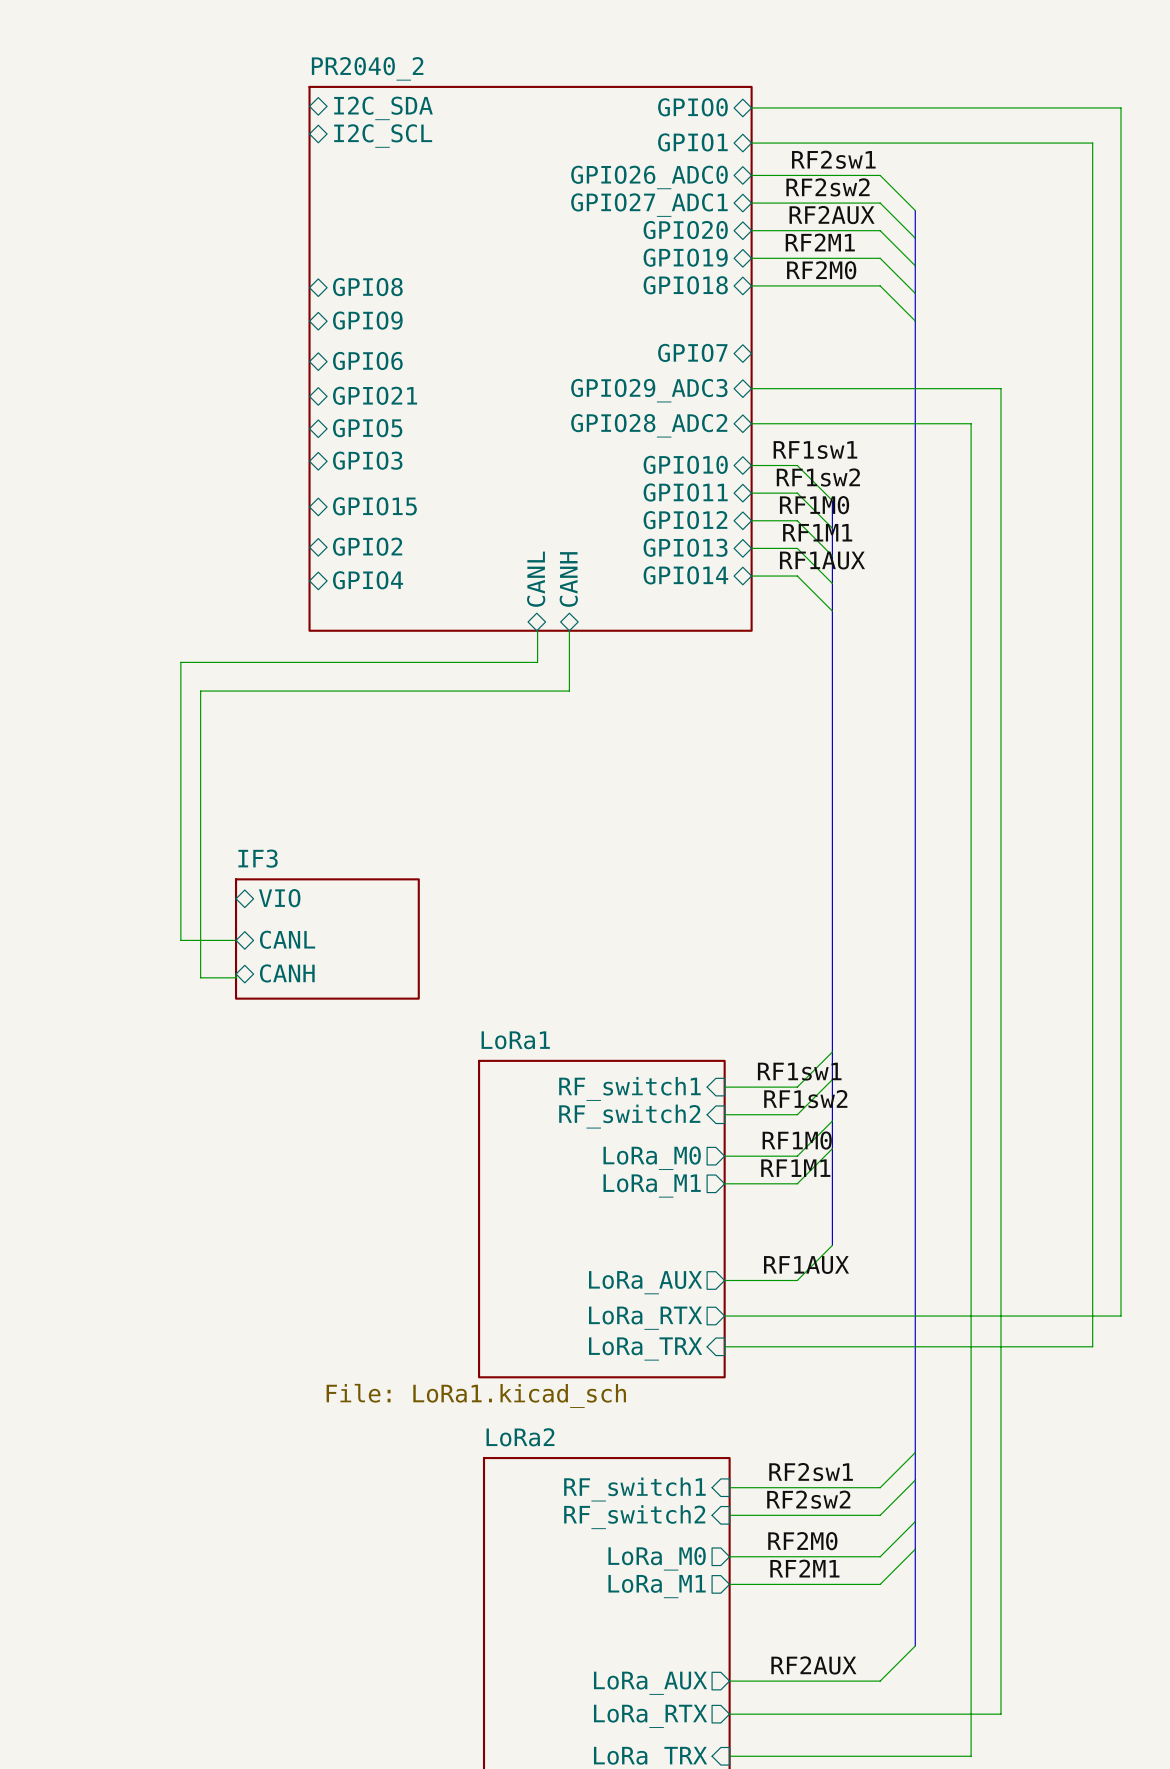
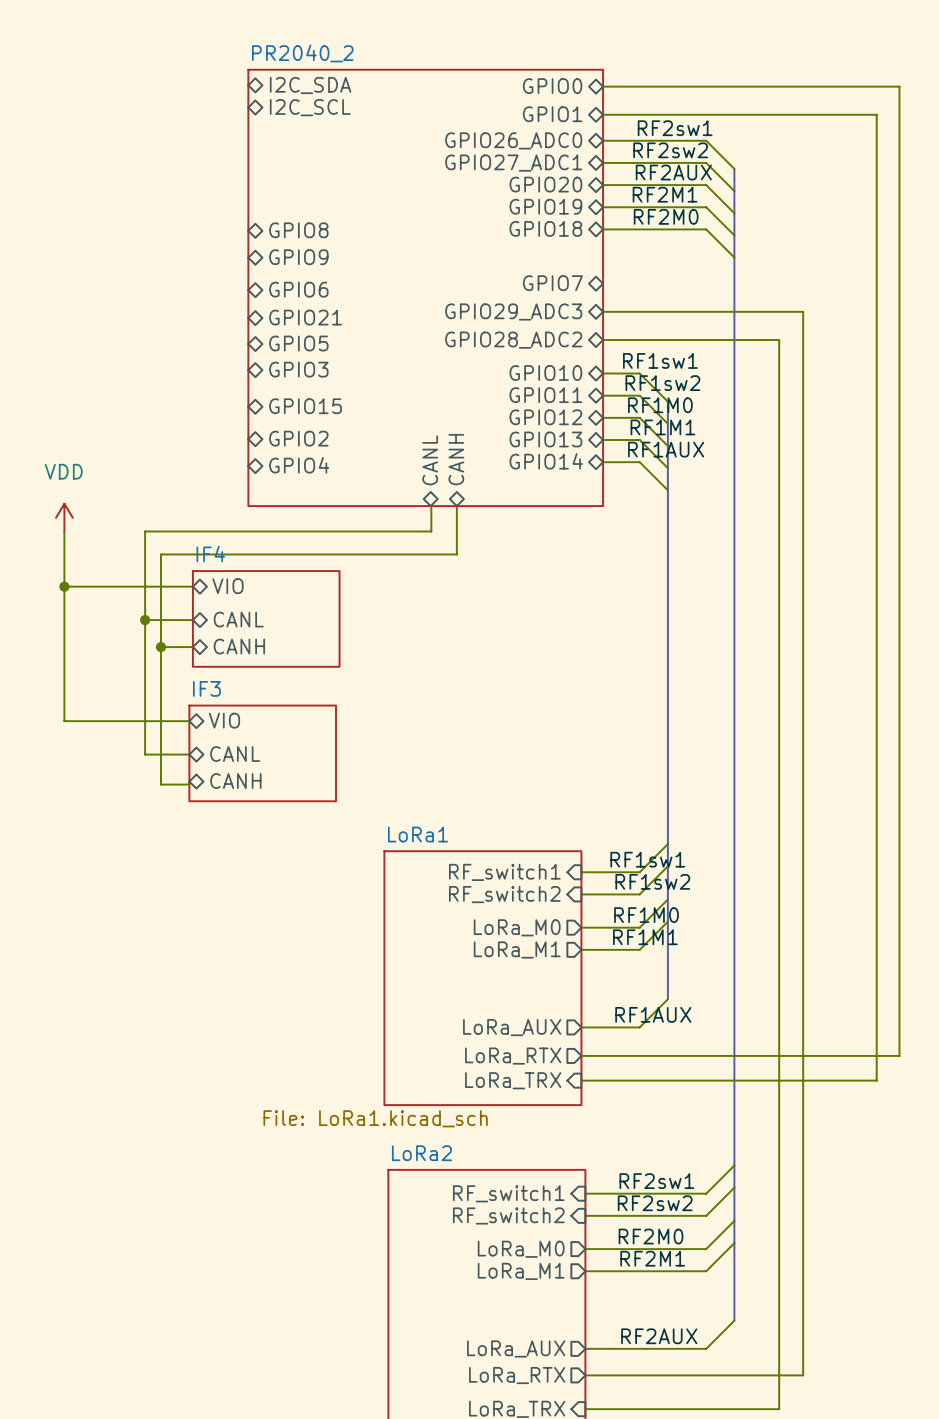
power symbol: none -> VDD (64, 517)
wire: none -> (64, 531) (64, 721) (189, 721)
sheet pin: none -> VIO (227, 586)
wire: none -> (64, 586) (192, 586)
junction: none -> (64, 586)
sheet IF4: none -> (266, 618)
wire: none -> (145, 620) (192, 620)
junction: none -> (145, 620)
sheet pin: none -> CANL (238, 619)
sheet pin: none -> CANH (239, 646)
wire: none -> (160, 647) (192, 647)
junction: none -> (160, 647)

